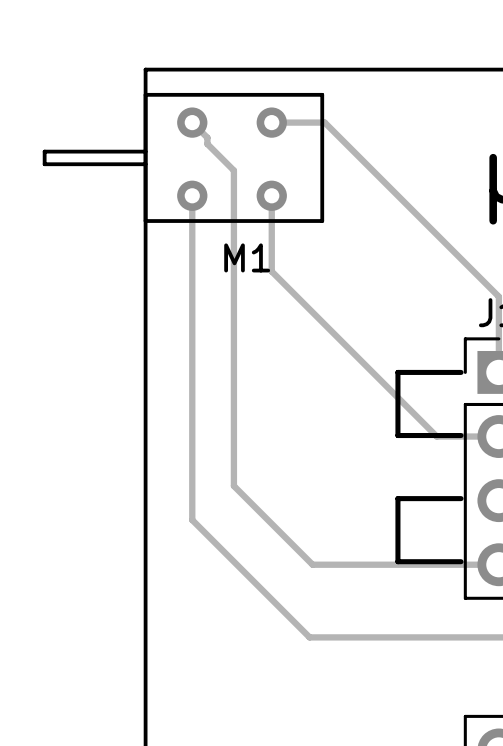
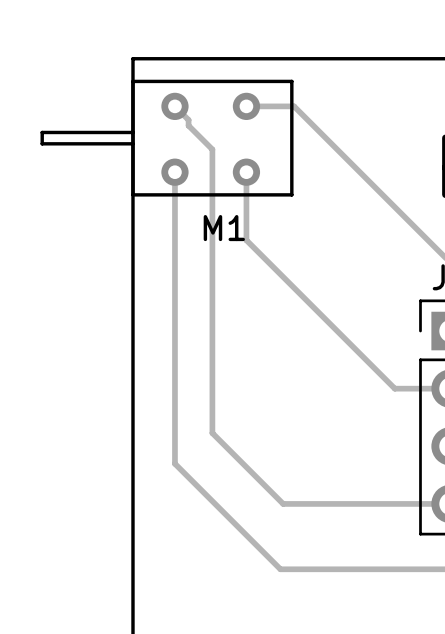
line: (461, 372) (397, 372) (397, 435) (461, 435) -> none
line: (461, 498) (397, 498) (397, 561) (461, 561) -> none

